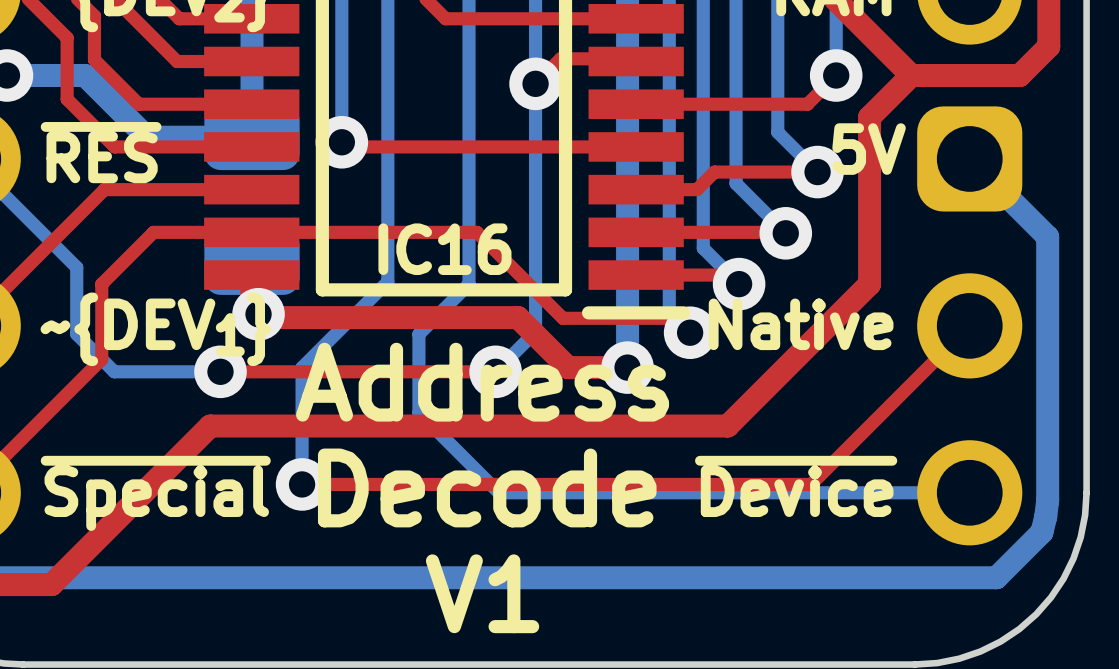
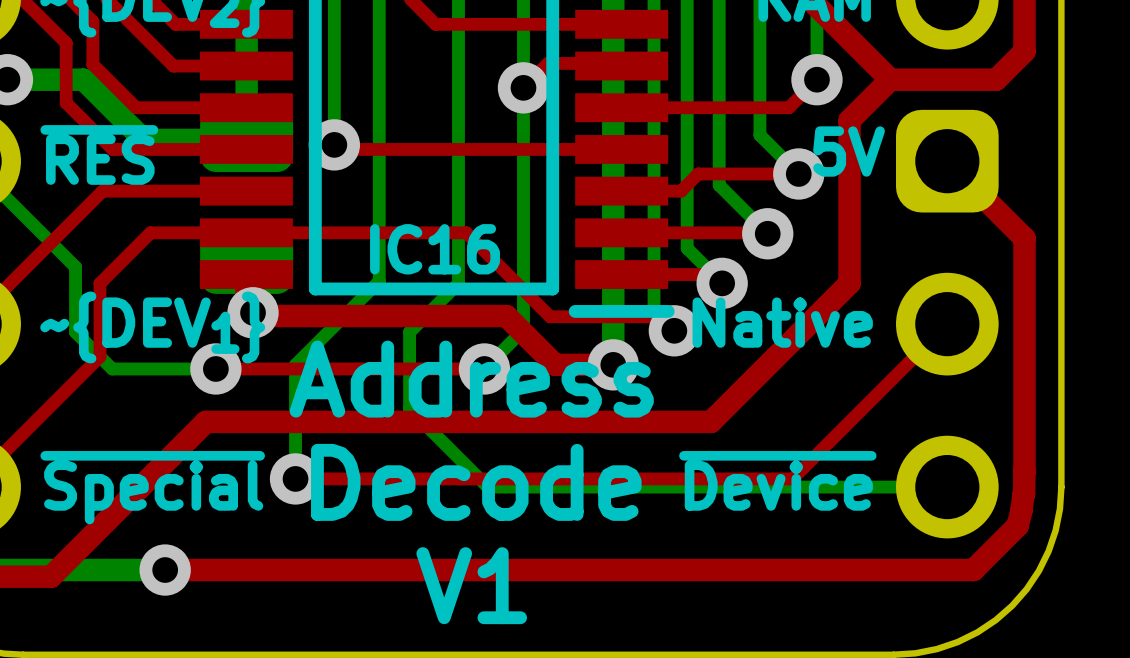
top track: none -> (947, 161) (1024, 238) (1024, 494)
bottom track: (969, 158) (1047, 236) (1047, 500) (1045, 516) (1041, 532) (996, 577) (168, 577) -> none
top track: none -> (1023, 494) (1017, 525) (973, 570) (165, 570)
via: none -> (165, 570)

